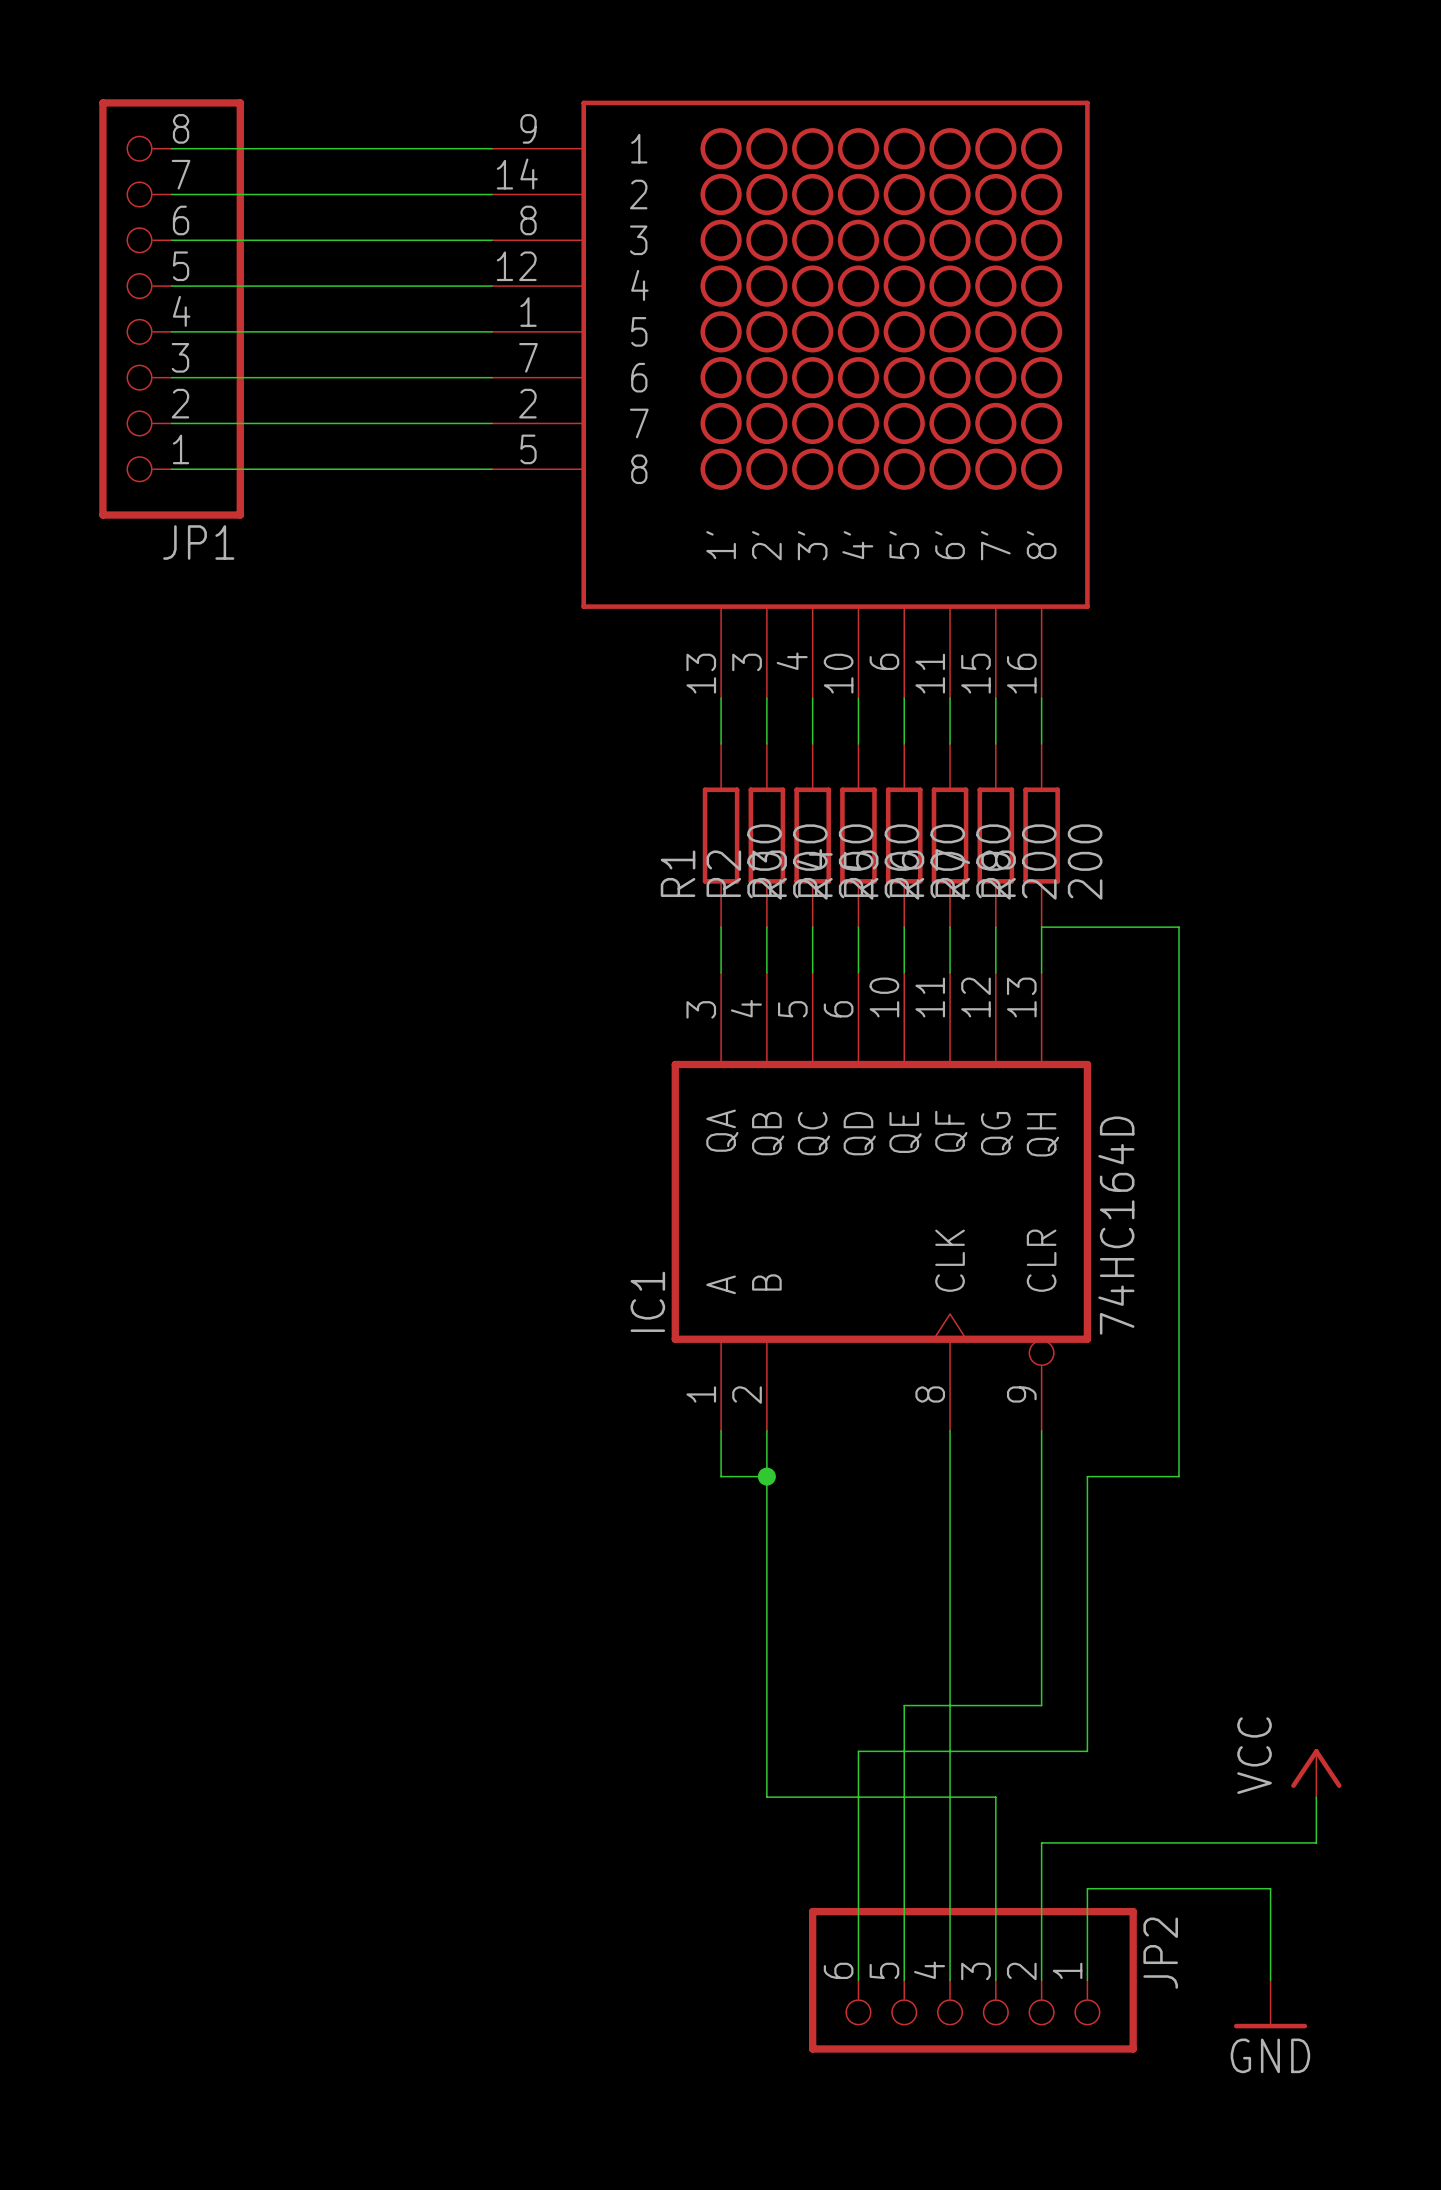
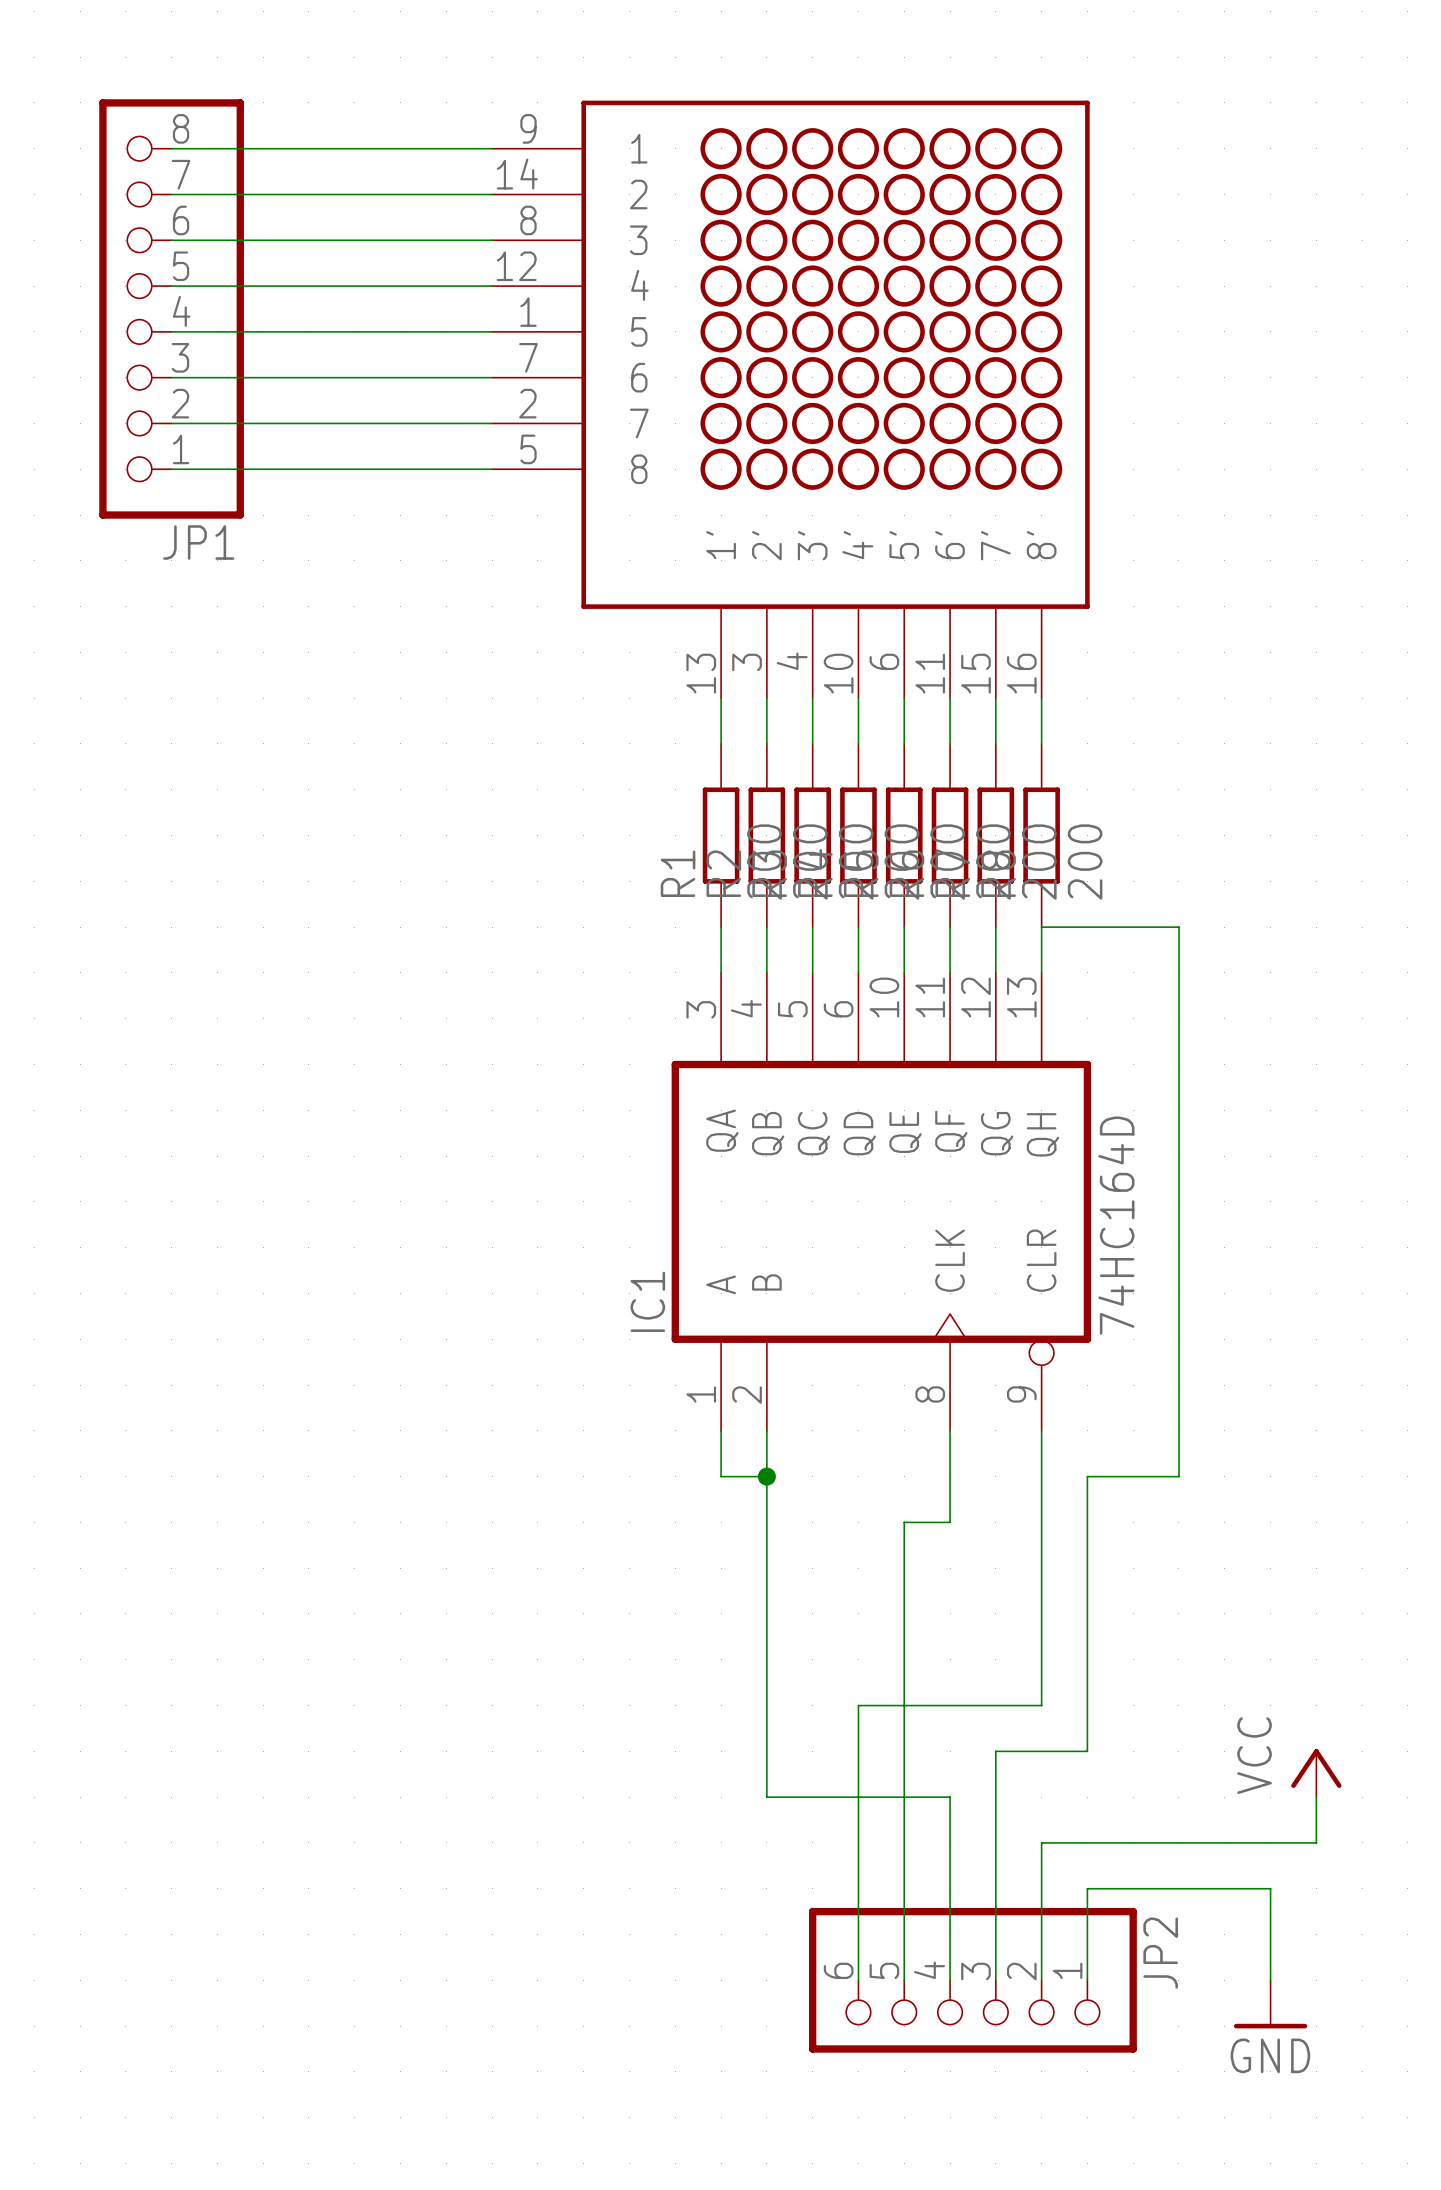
wire: (950, 1522) (950, 1797) (995, 1797) -> (950, 1522) (904, 1522) (904, 1705) (858, 1705) (858, 1751)
wire: (858, 1751) (995, 1751) -> (995, 1797) (995, 1751)

